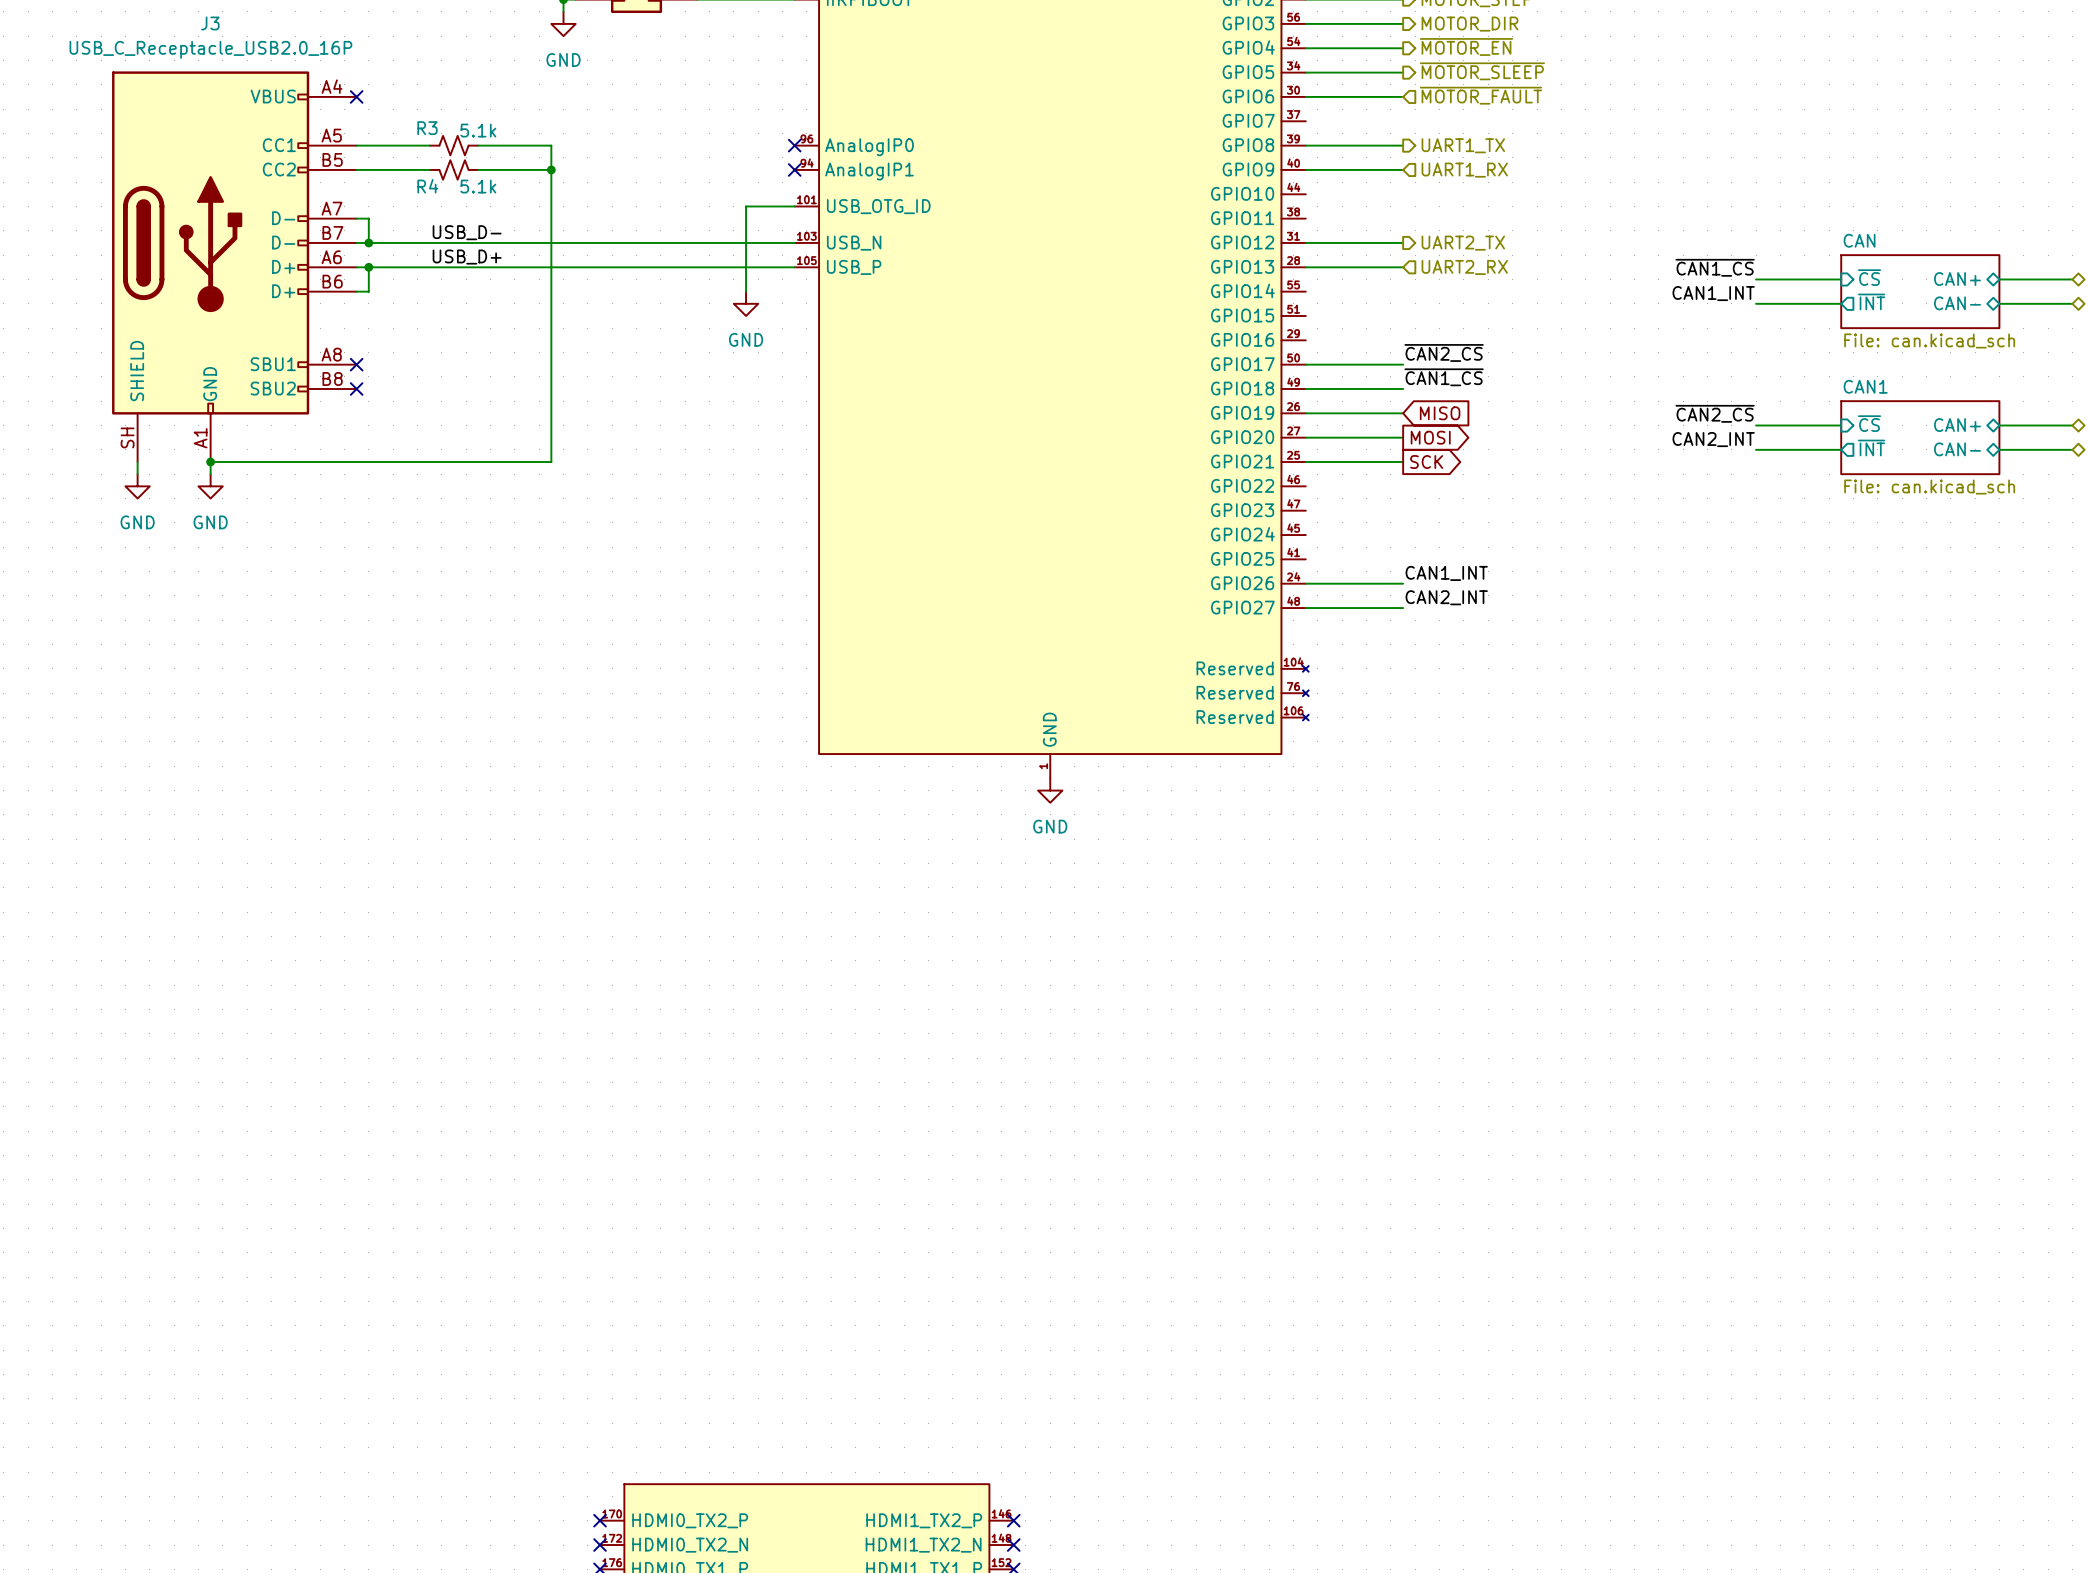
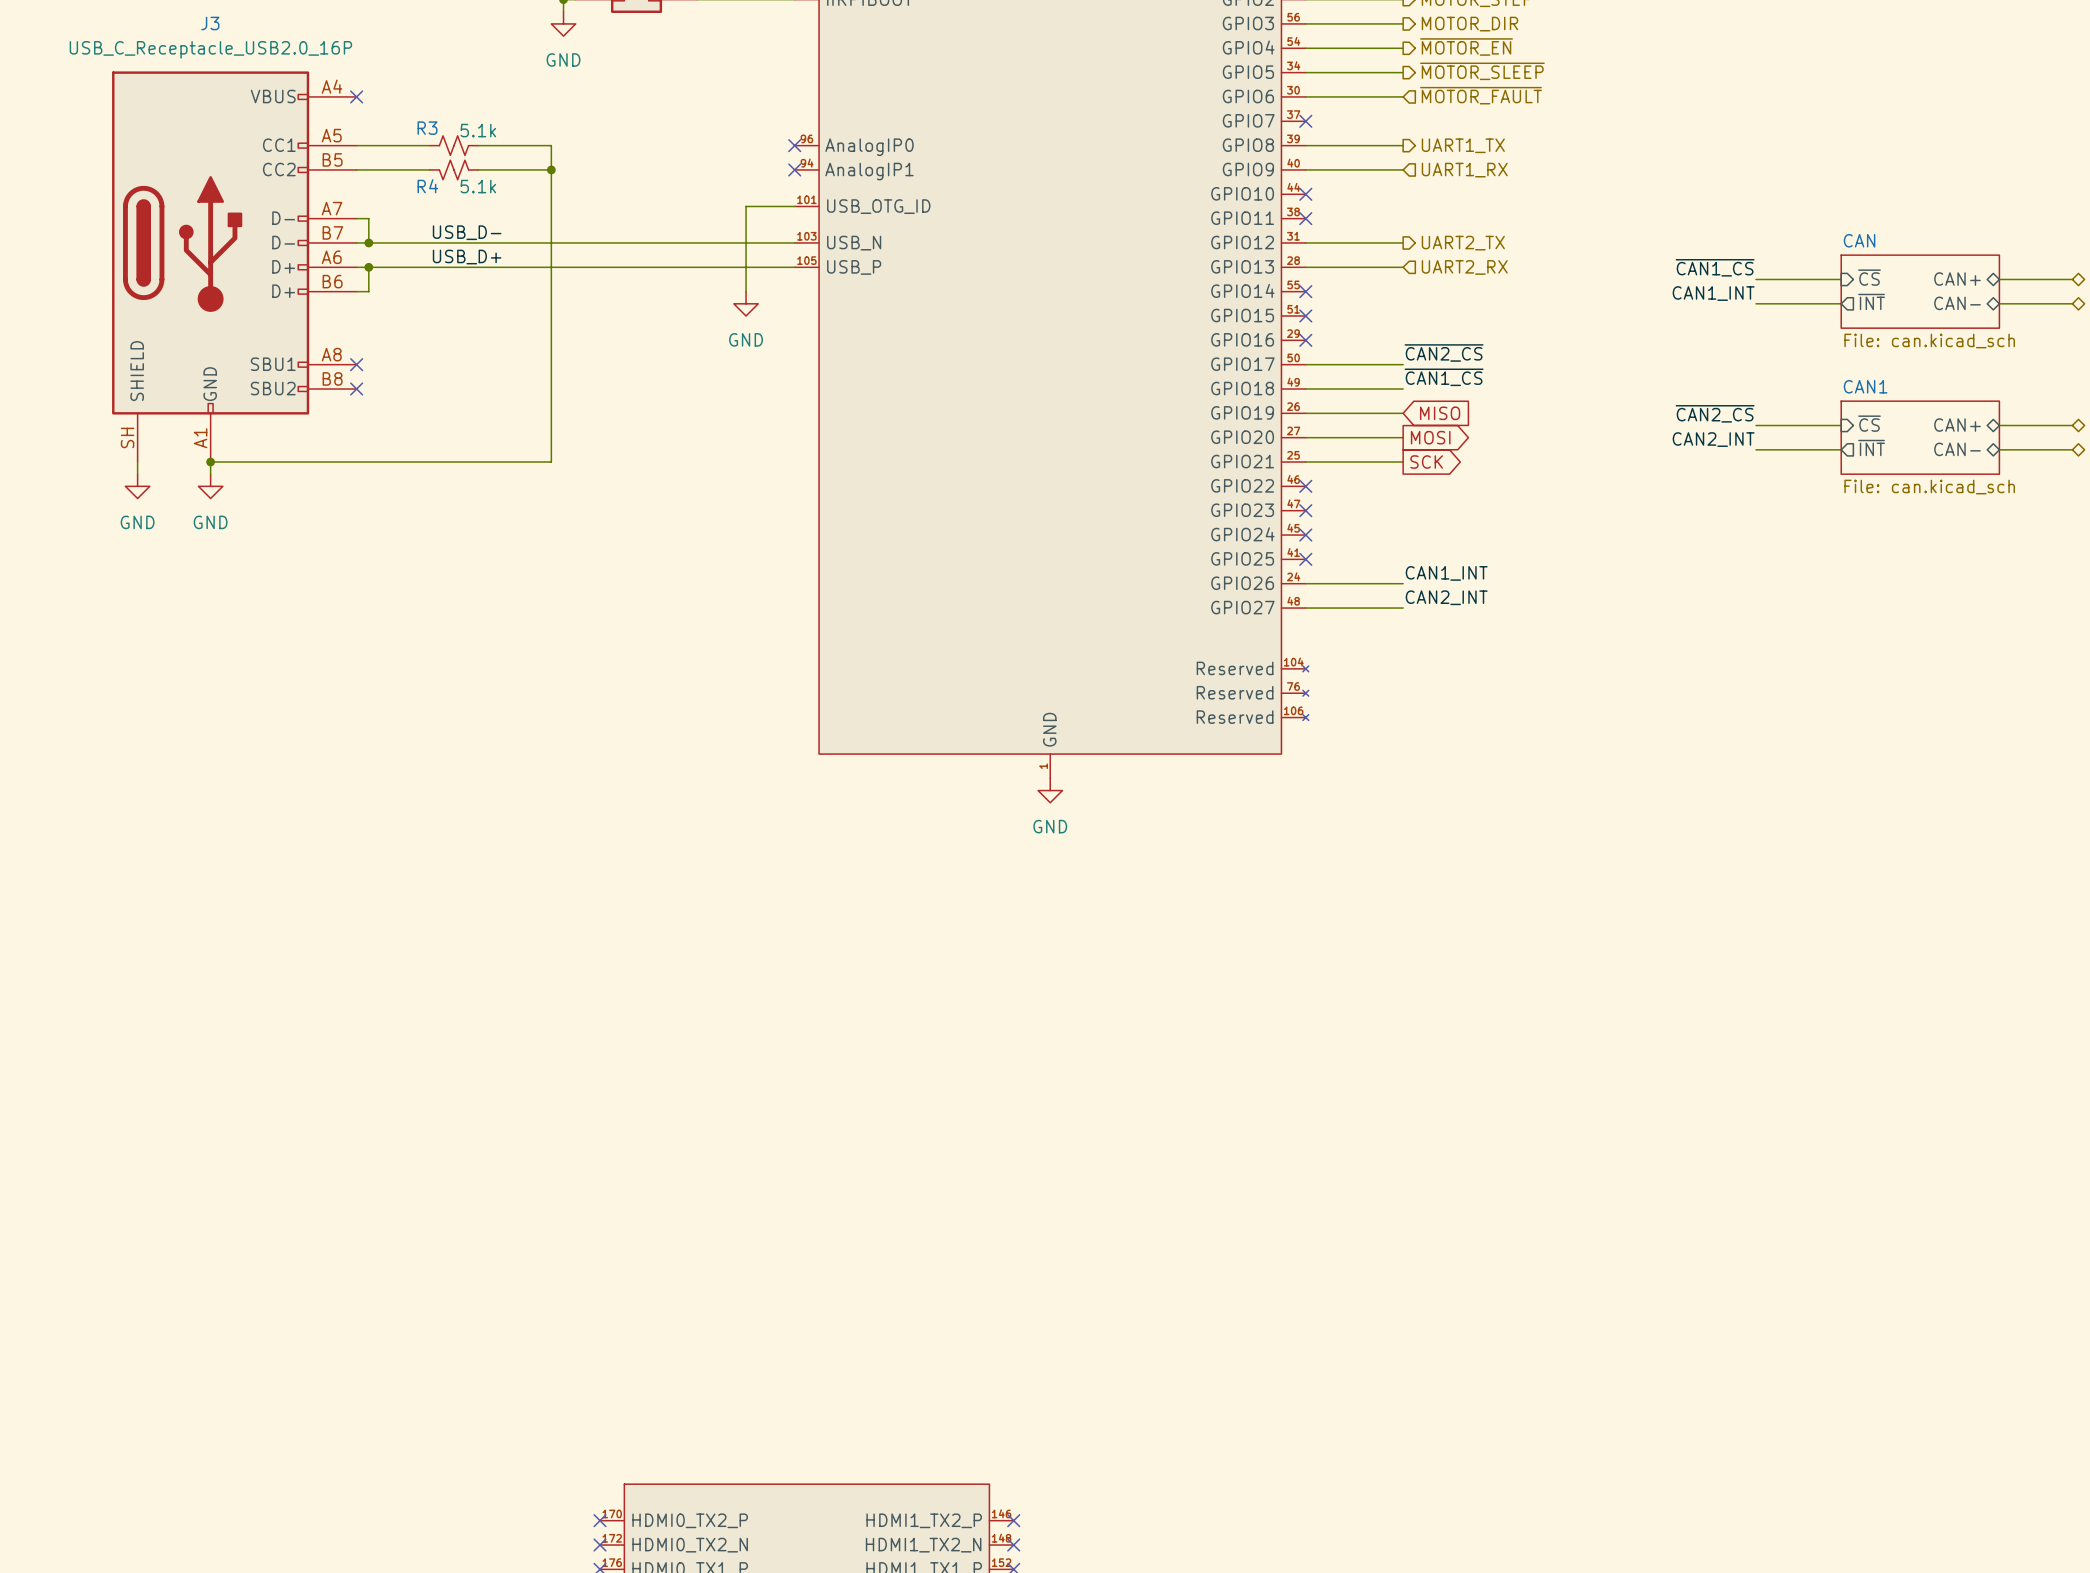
no-connect mark: none -> (1305, 121)
no-connect mark: none -> (1305, 194)
no-connect mark: none -> (1305, 218)
no-connect mark: none -> (1305, 291)
no-connect mark: none -> (1305, 315)
no-connect mark: none -> (1305, 340)
no-connect mark: none -> (1305, 486)
no-connect mark: none -> (1305, 510)
no-connect mark: none -> (1305, 535)
no-connect mark: none -> (1305, 559)

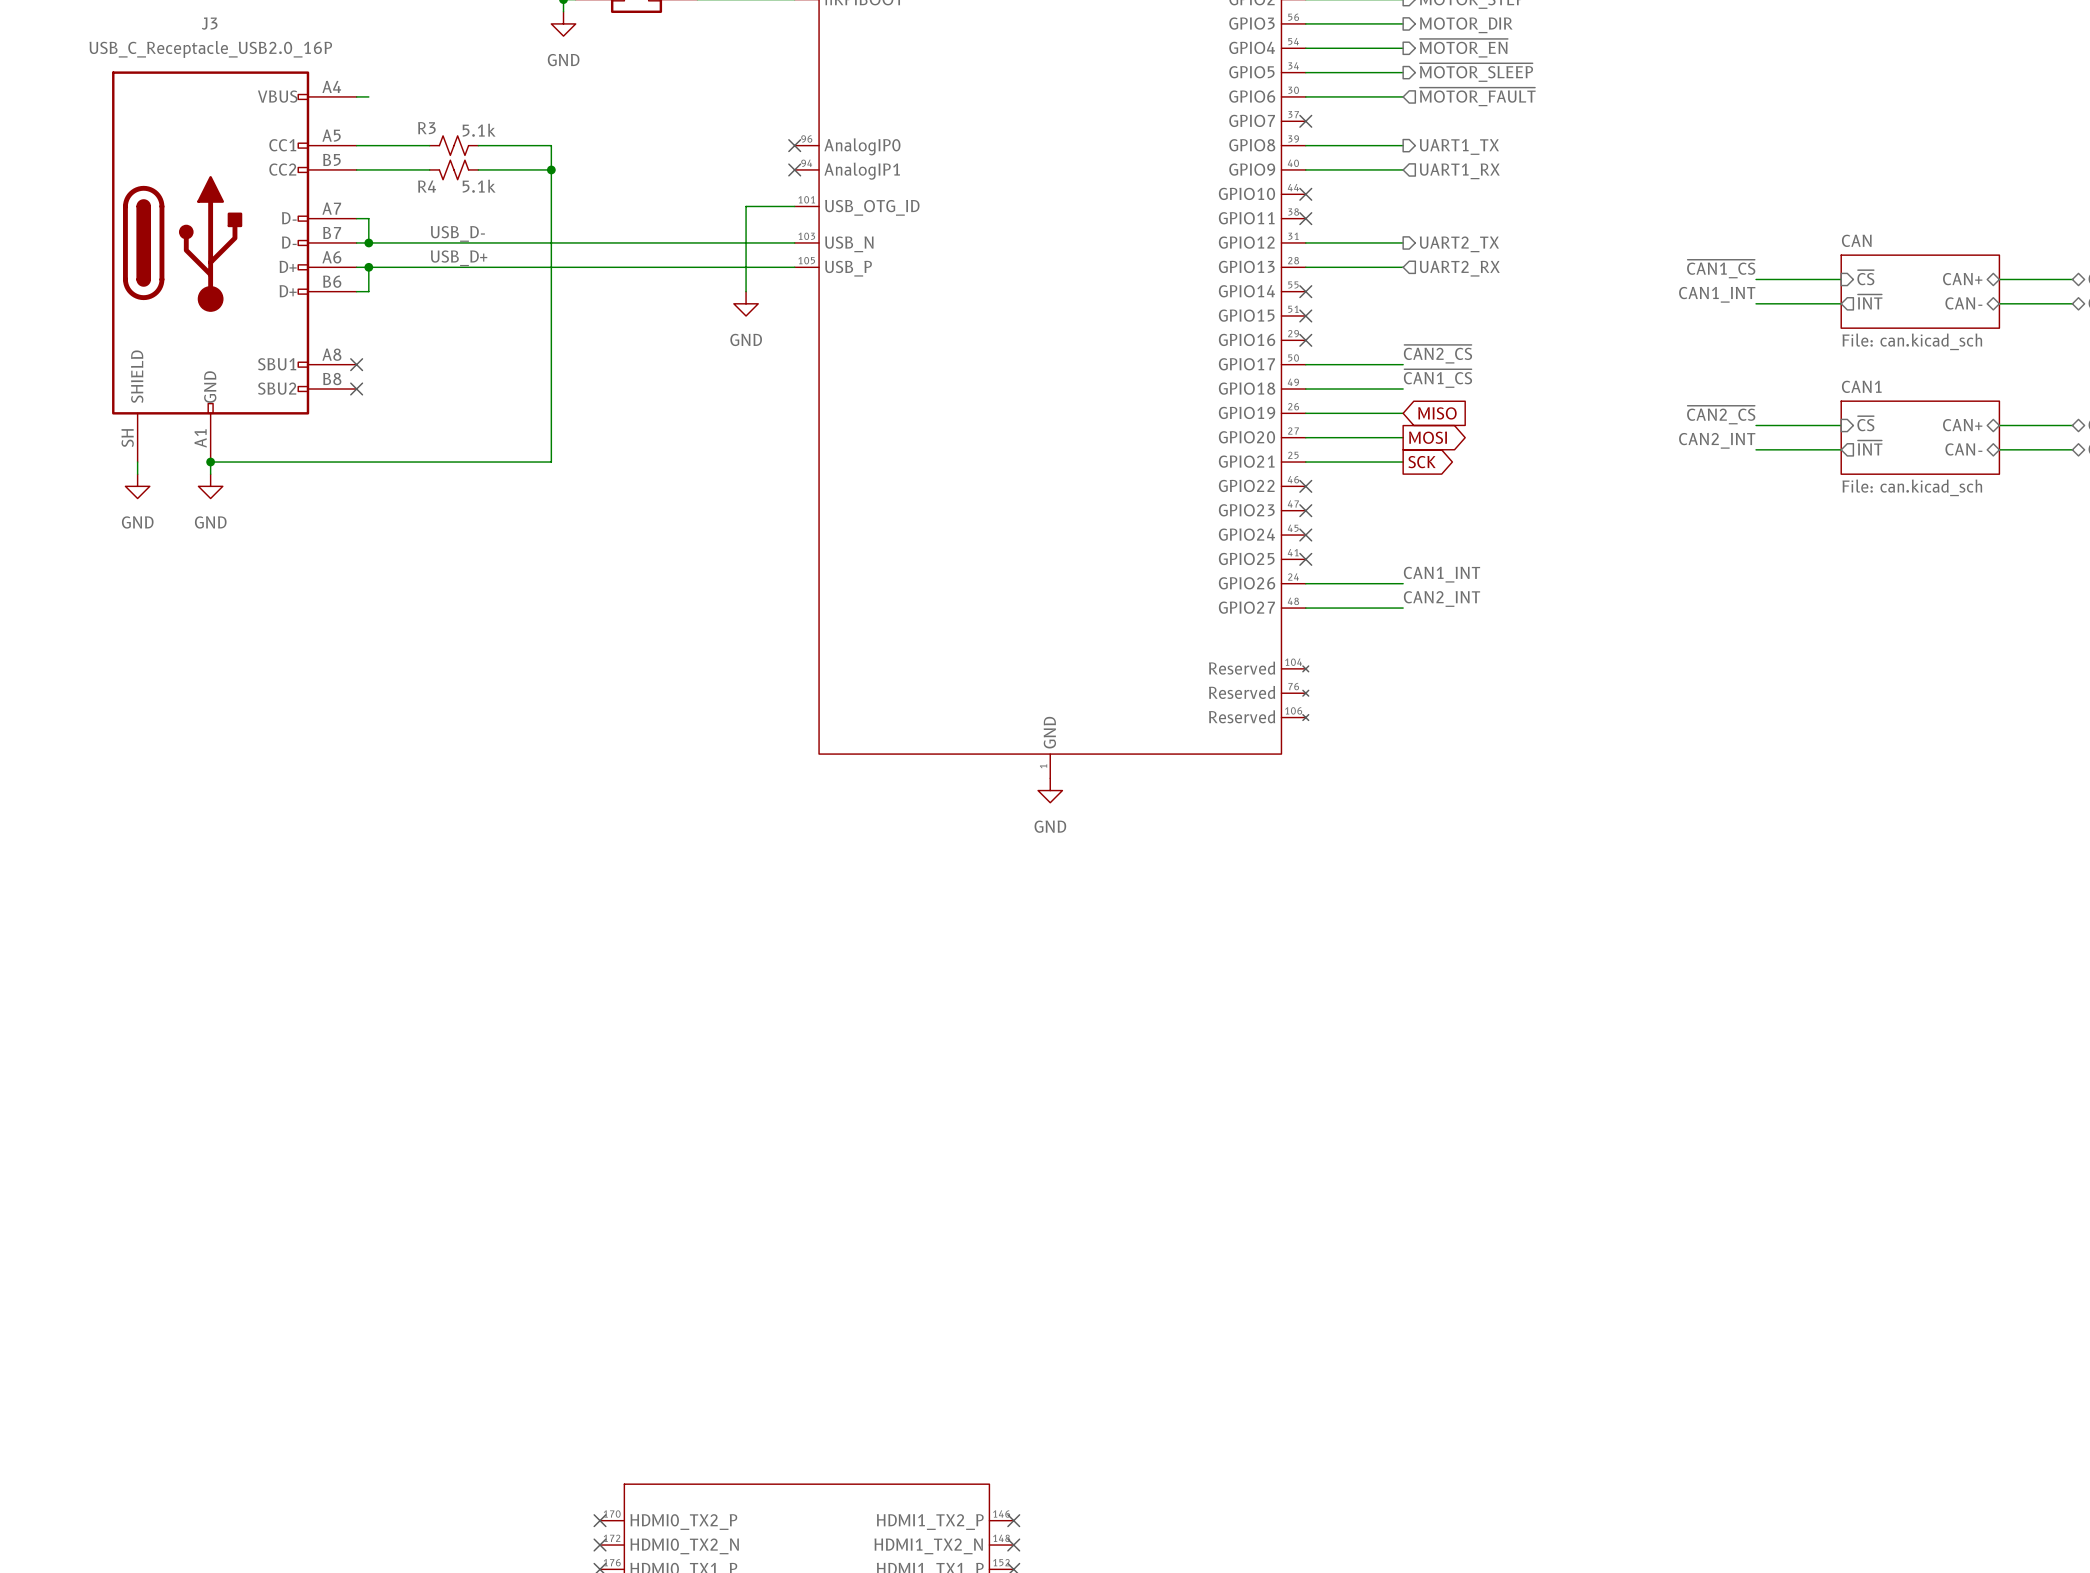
wire: none -> (356, 96) (368, 96)
no-connect mark: (356, 96) -> none

